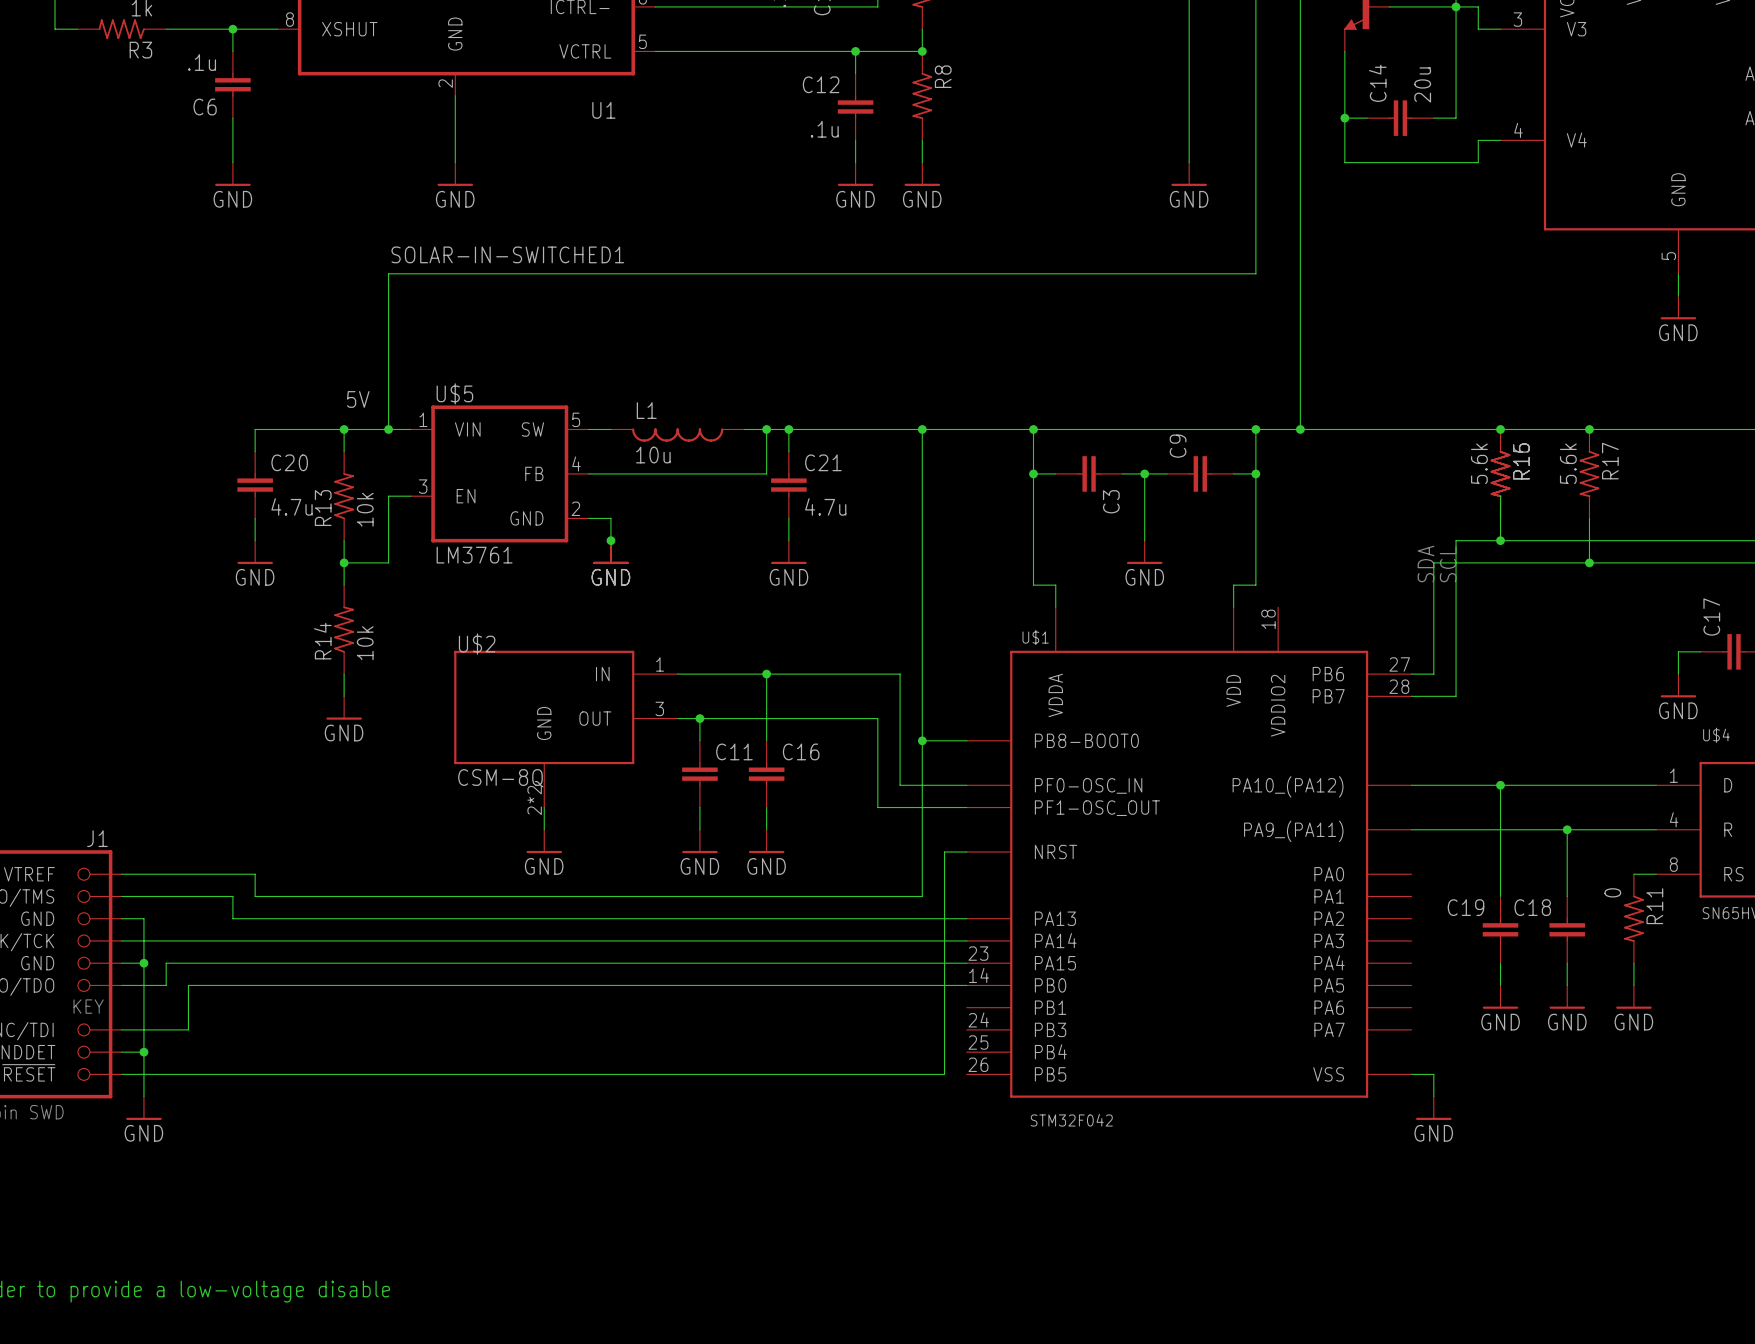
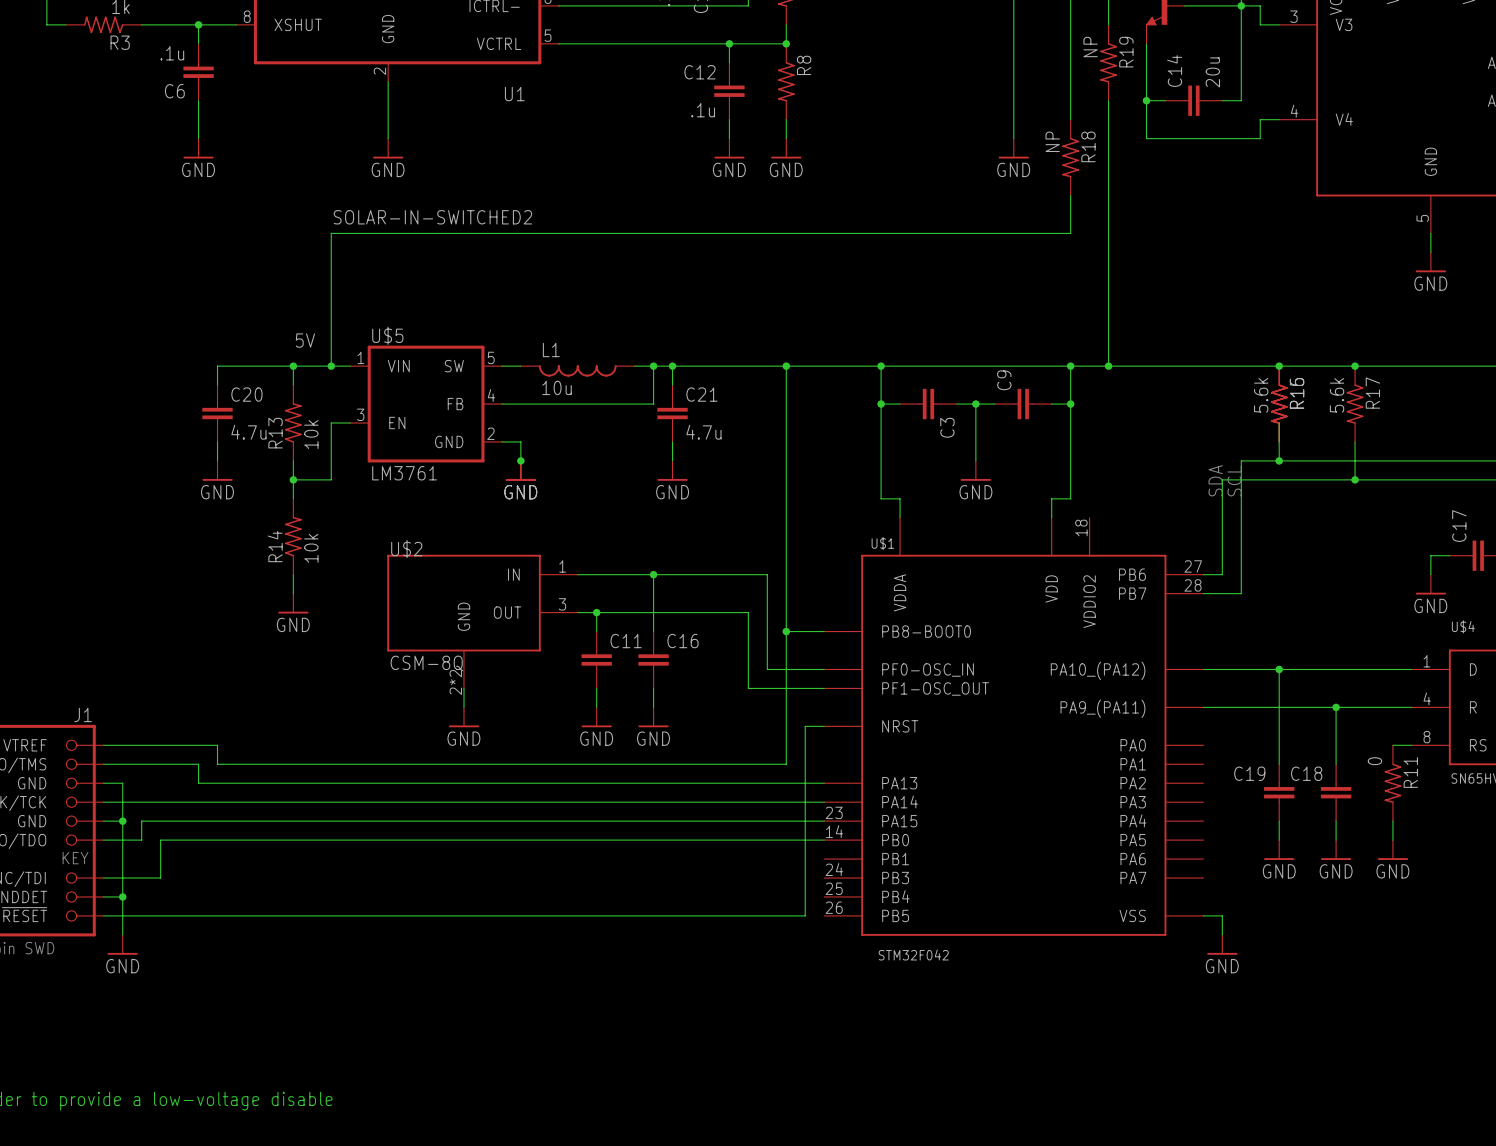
R19: none -> NP (1108, 62)
R18: none -> NP (1070, 157)
label: SOLAR-IN-SWITCHED1 (507, 254) -> SOLAR-IN-SWITCHED2 (432, 217)

